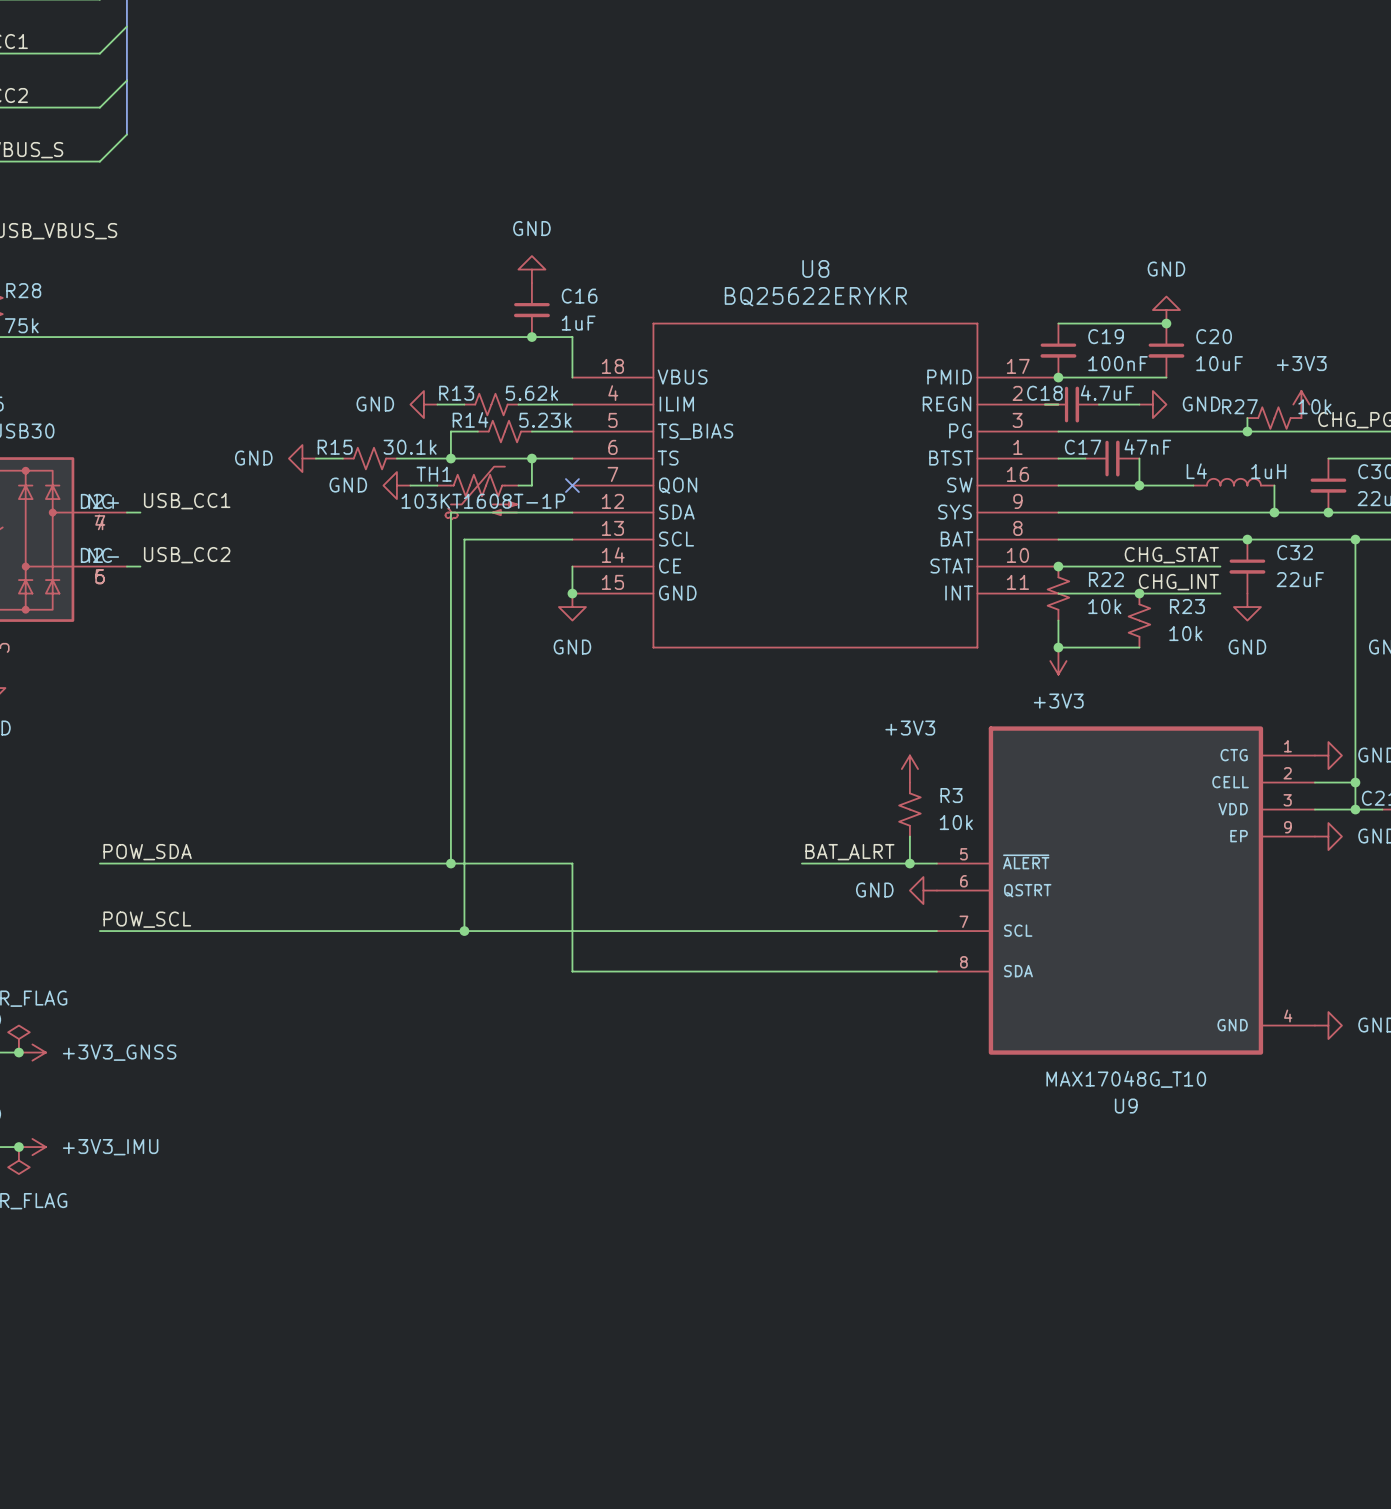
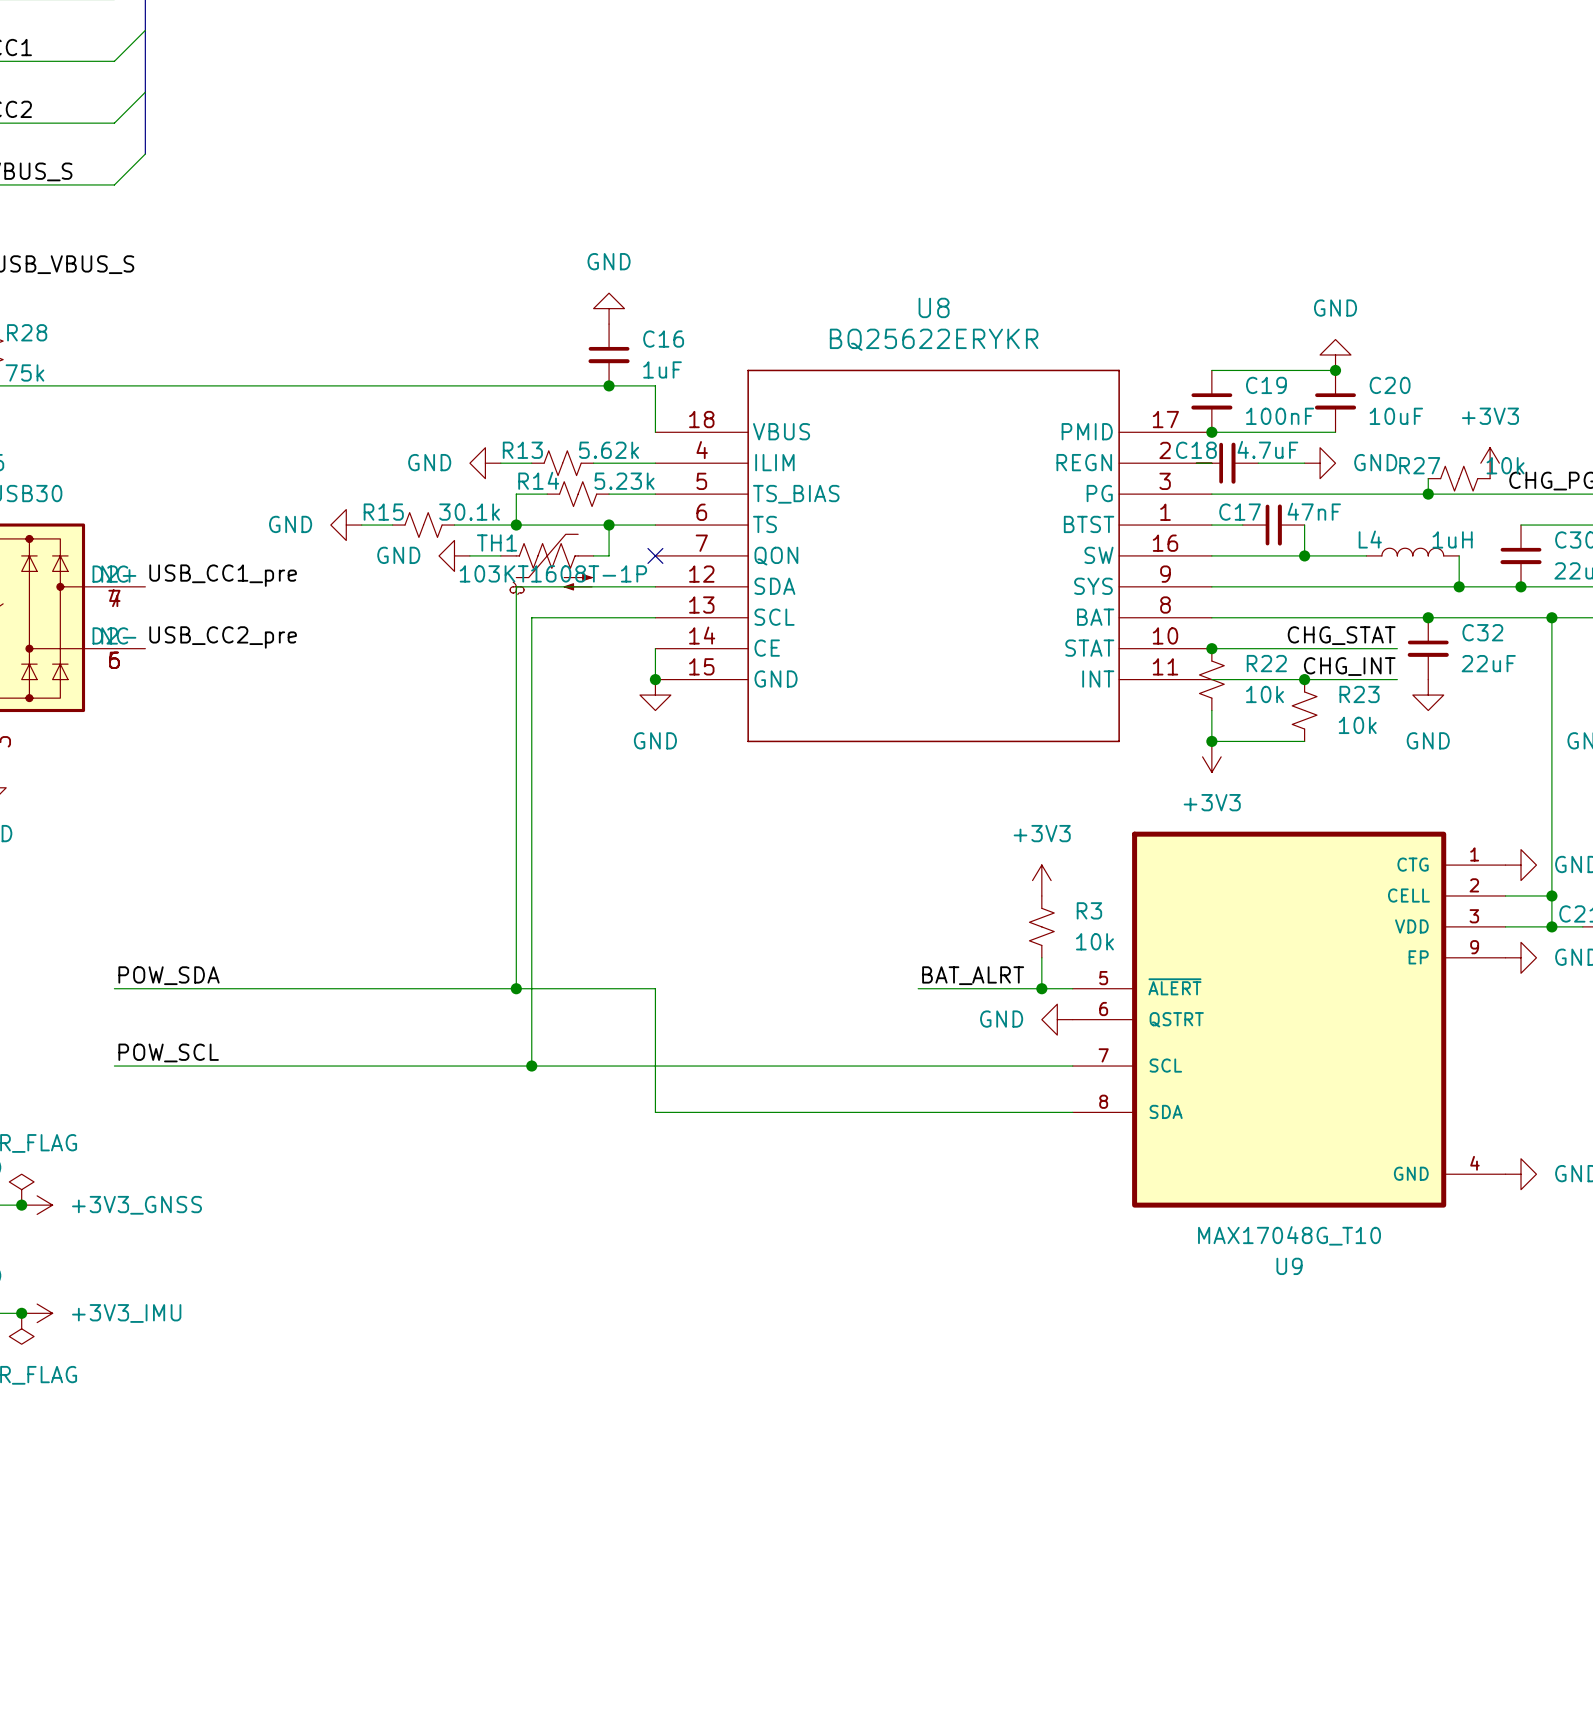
label: USB_CC1 (187, 501) -> USB_CC1_pre (223, 575)
wire: (126, 512) (140, 512) -> none
label: USB_CC2 (187, 555) -> USB_CC2_pre (223, 637)
wire: (126, 566) (140, 566) -> none

